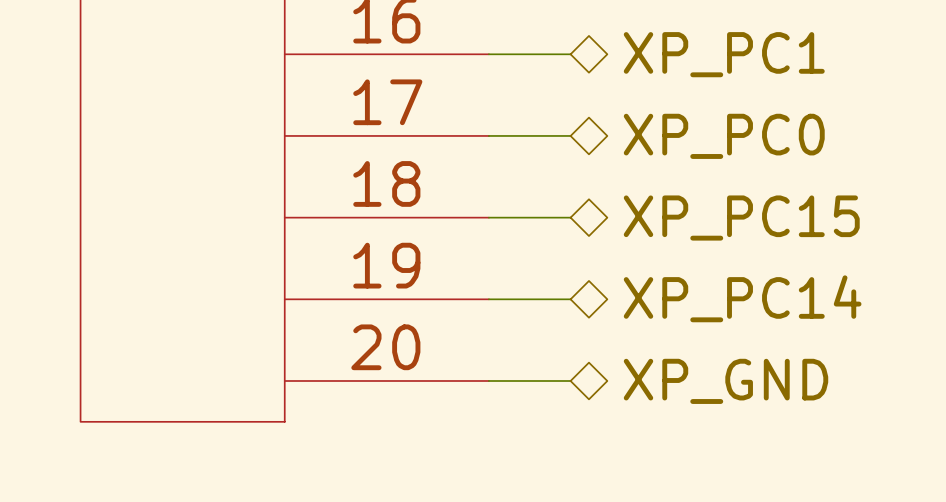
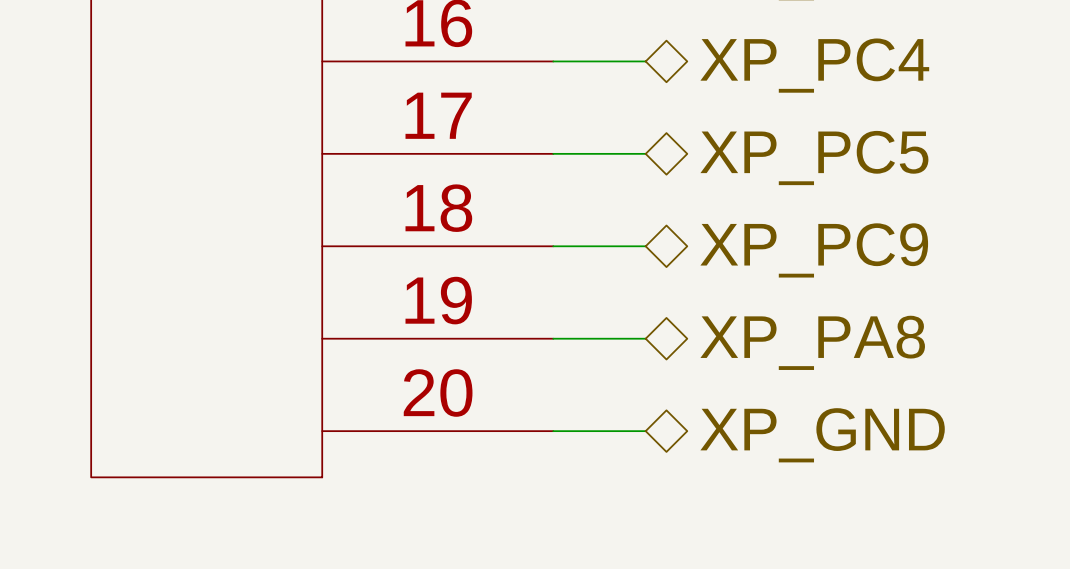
hierarchical label: XP_PC1 (724, 54) -> XP_PC4 (814, 65)
hierarchical label: XP_PC0 (724, 136) -> XP_PC5 (814, 158)
hierarchical label: XP_PC15 (741, 218) -> XP_PC9 (814, 250)
hierarchical label: XP_PC14 (742, 298) -> XP_PA8 (812, 342)

